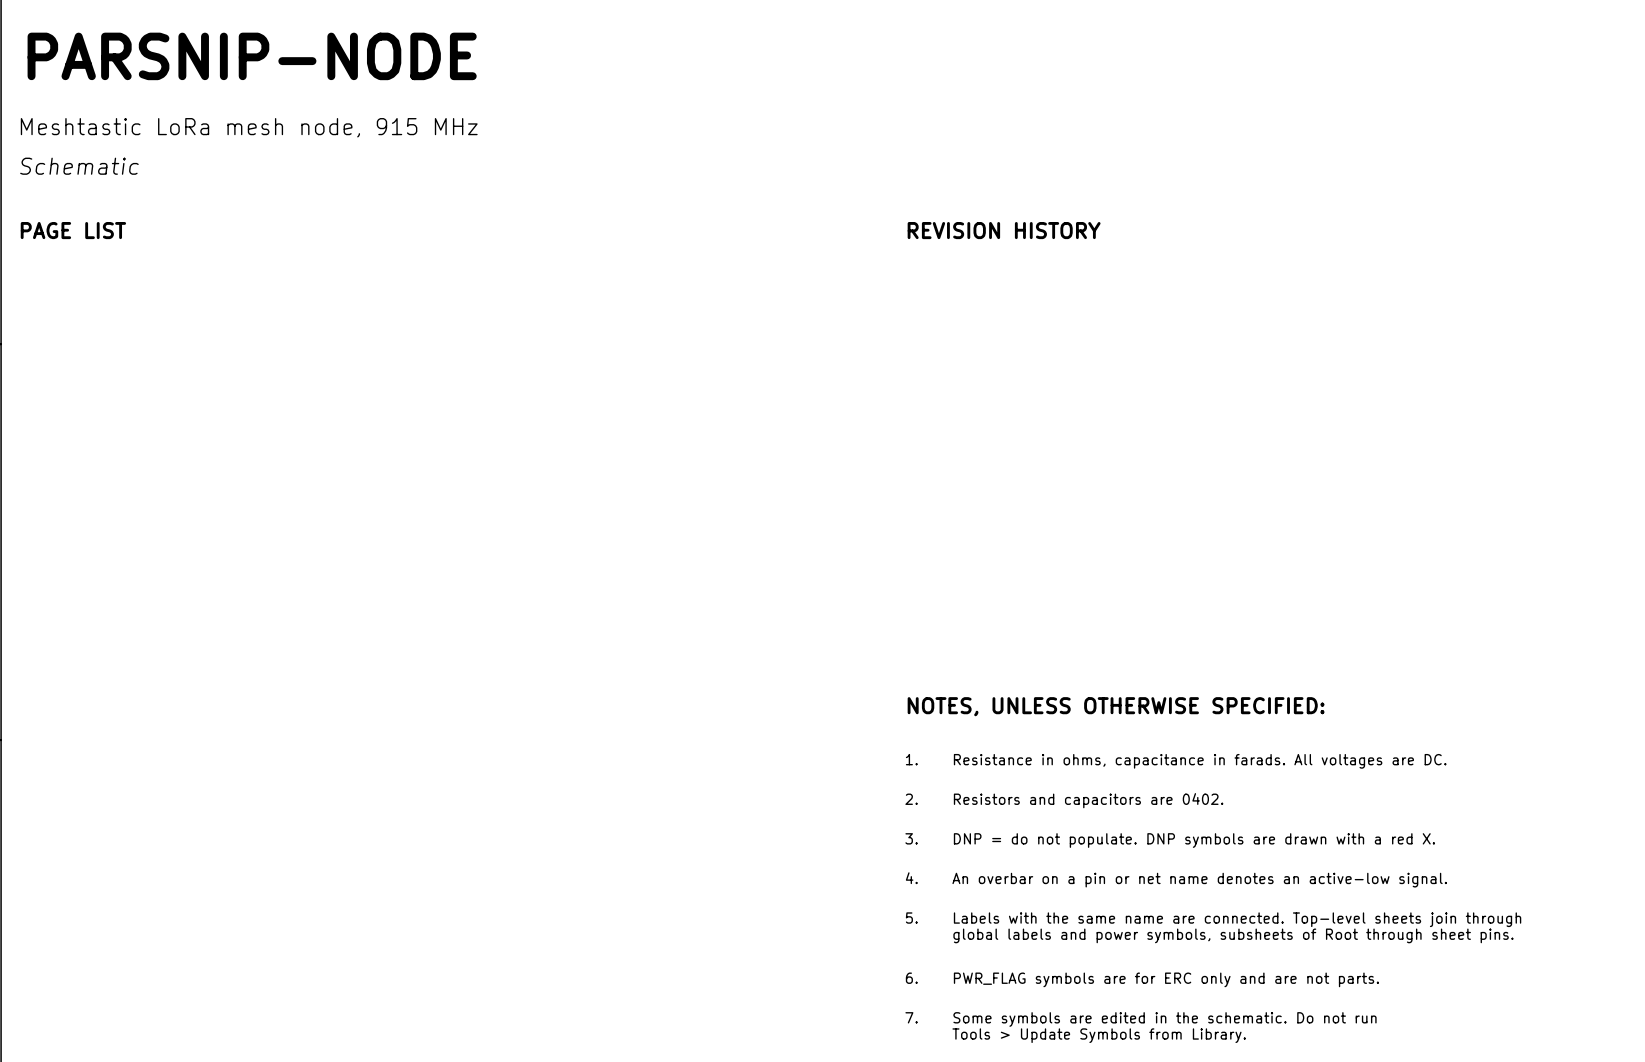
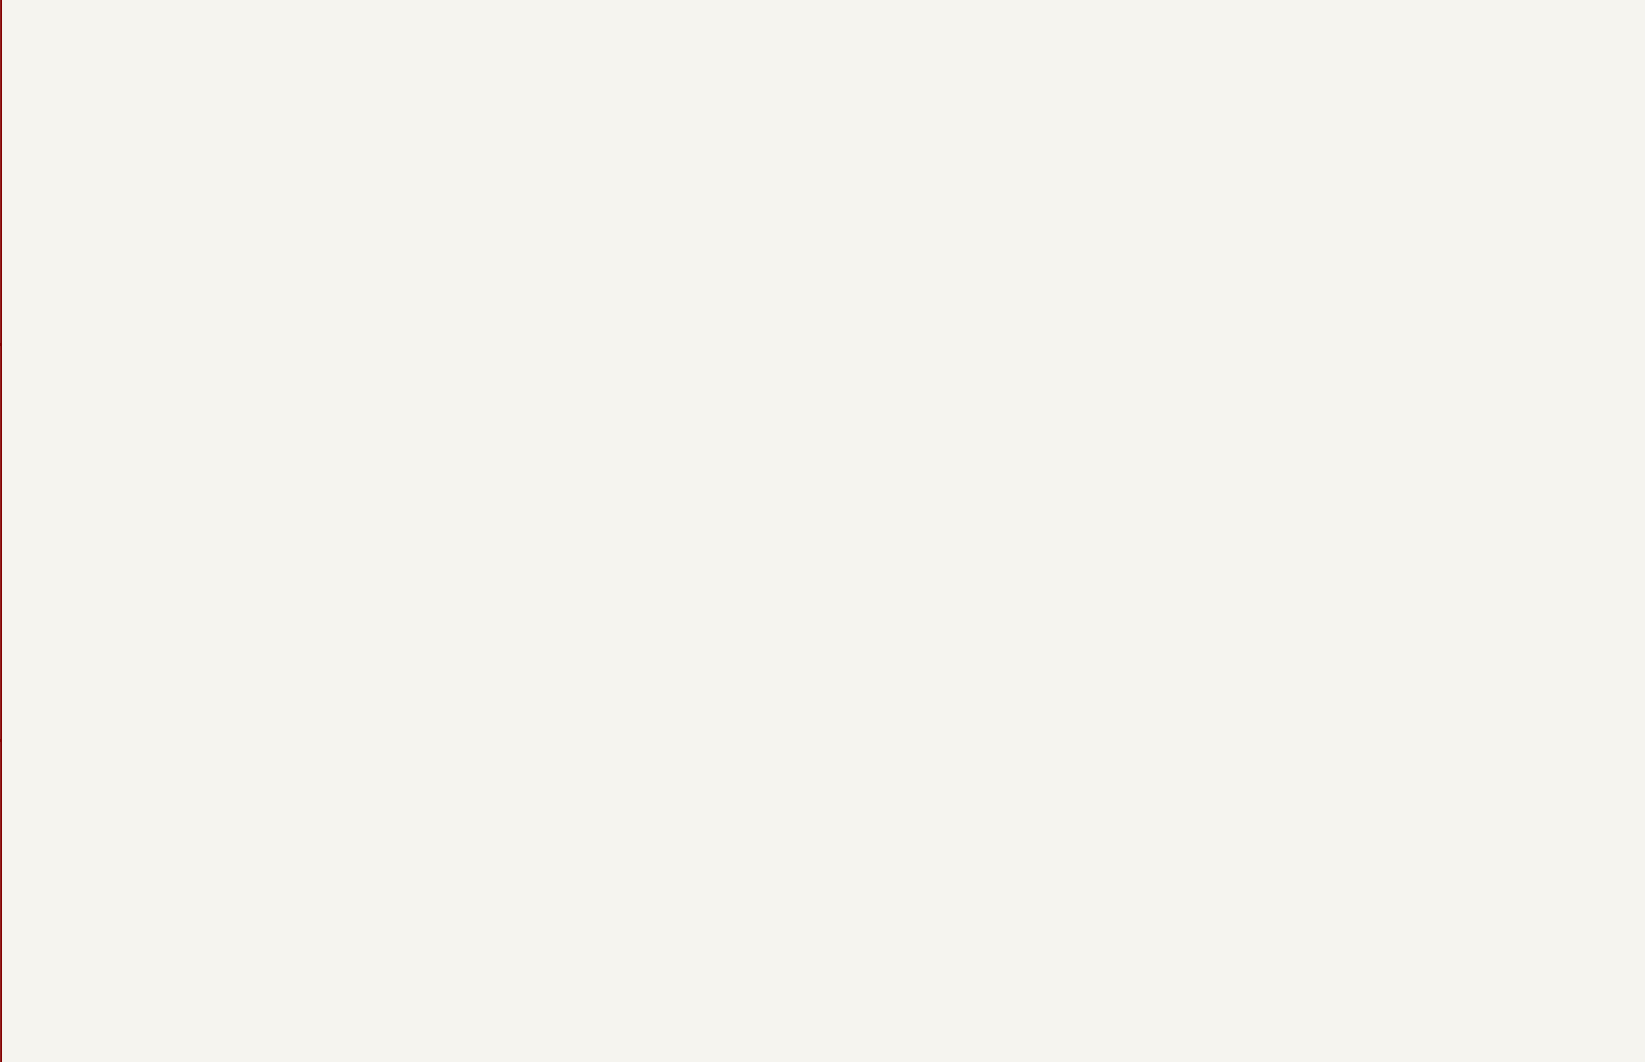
text: PARSNIP-NODE (252, 56) -> none
text: Meshtastic LoRa mesh node, 915 MHz (249, 127) -> none
text: Schematic (79, 166) -> none
text: PAGE LIST (73, 230) -> none
text: REVISION HISTORY (1004, 230) -> none
text: NOTES, UNLESS OTHERWISE SPECIFIED: (1116, 706) -> none
text: 1. (911, 759) -> none
text: Resistance in ohms, capacitance in farads. All voltages are DC. (1200, 761) -> none
text: 2. (911, 799) -> none
text: Resistors and capacitors are 0402. (1088, 800) -> none
text: 3. (911, 838) -> none
text: DNP = do not populate. DNP symbols are drawn with a red X. (1194, 840) -> none
text: 4. (911, 878) -> none
text: An overbar on a pin or net name denotes an active-low signal. (1199, 880) -> none
text: 5. (911, 918) -> none
text: Labels with the same name are connected. Top-level sheets join through (1237, 919) -> none
text: global labels and power symbols, subsheets of Root through sheet pins. (1233, 935) -> none
text: 6. (911, 978) -> none
text: PWR_FLAG symbols are for ERC only and are not parts. (1166, 979) -> none
text: 7. (911, 1017) -> none
text: Some symbols are edited in the schematic. Do not run (1164, 1019) -> none
text: Tools > Update Symbols from Library. (1099, 1035) -> none

